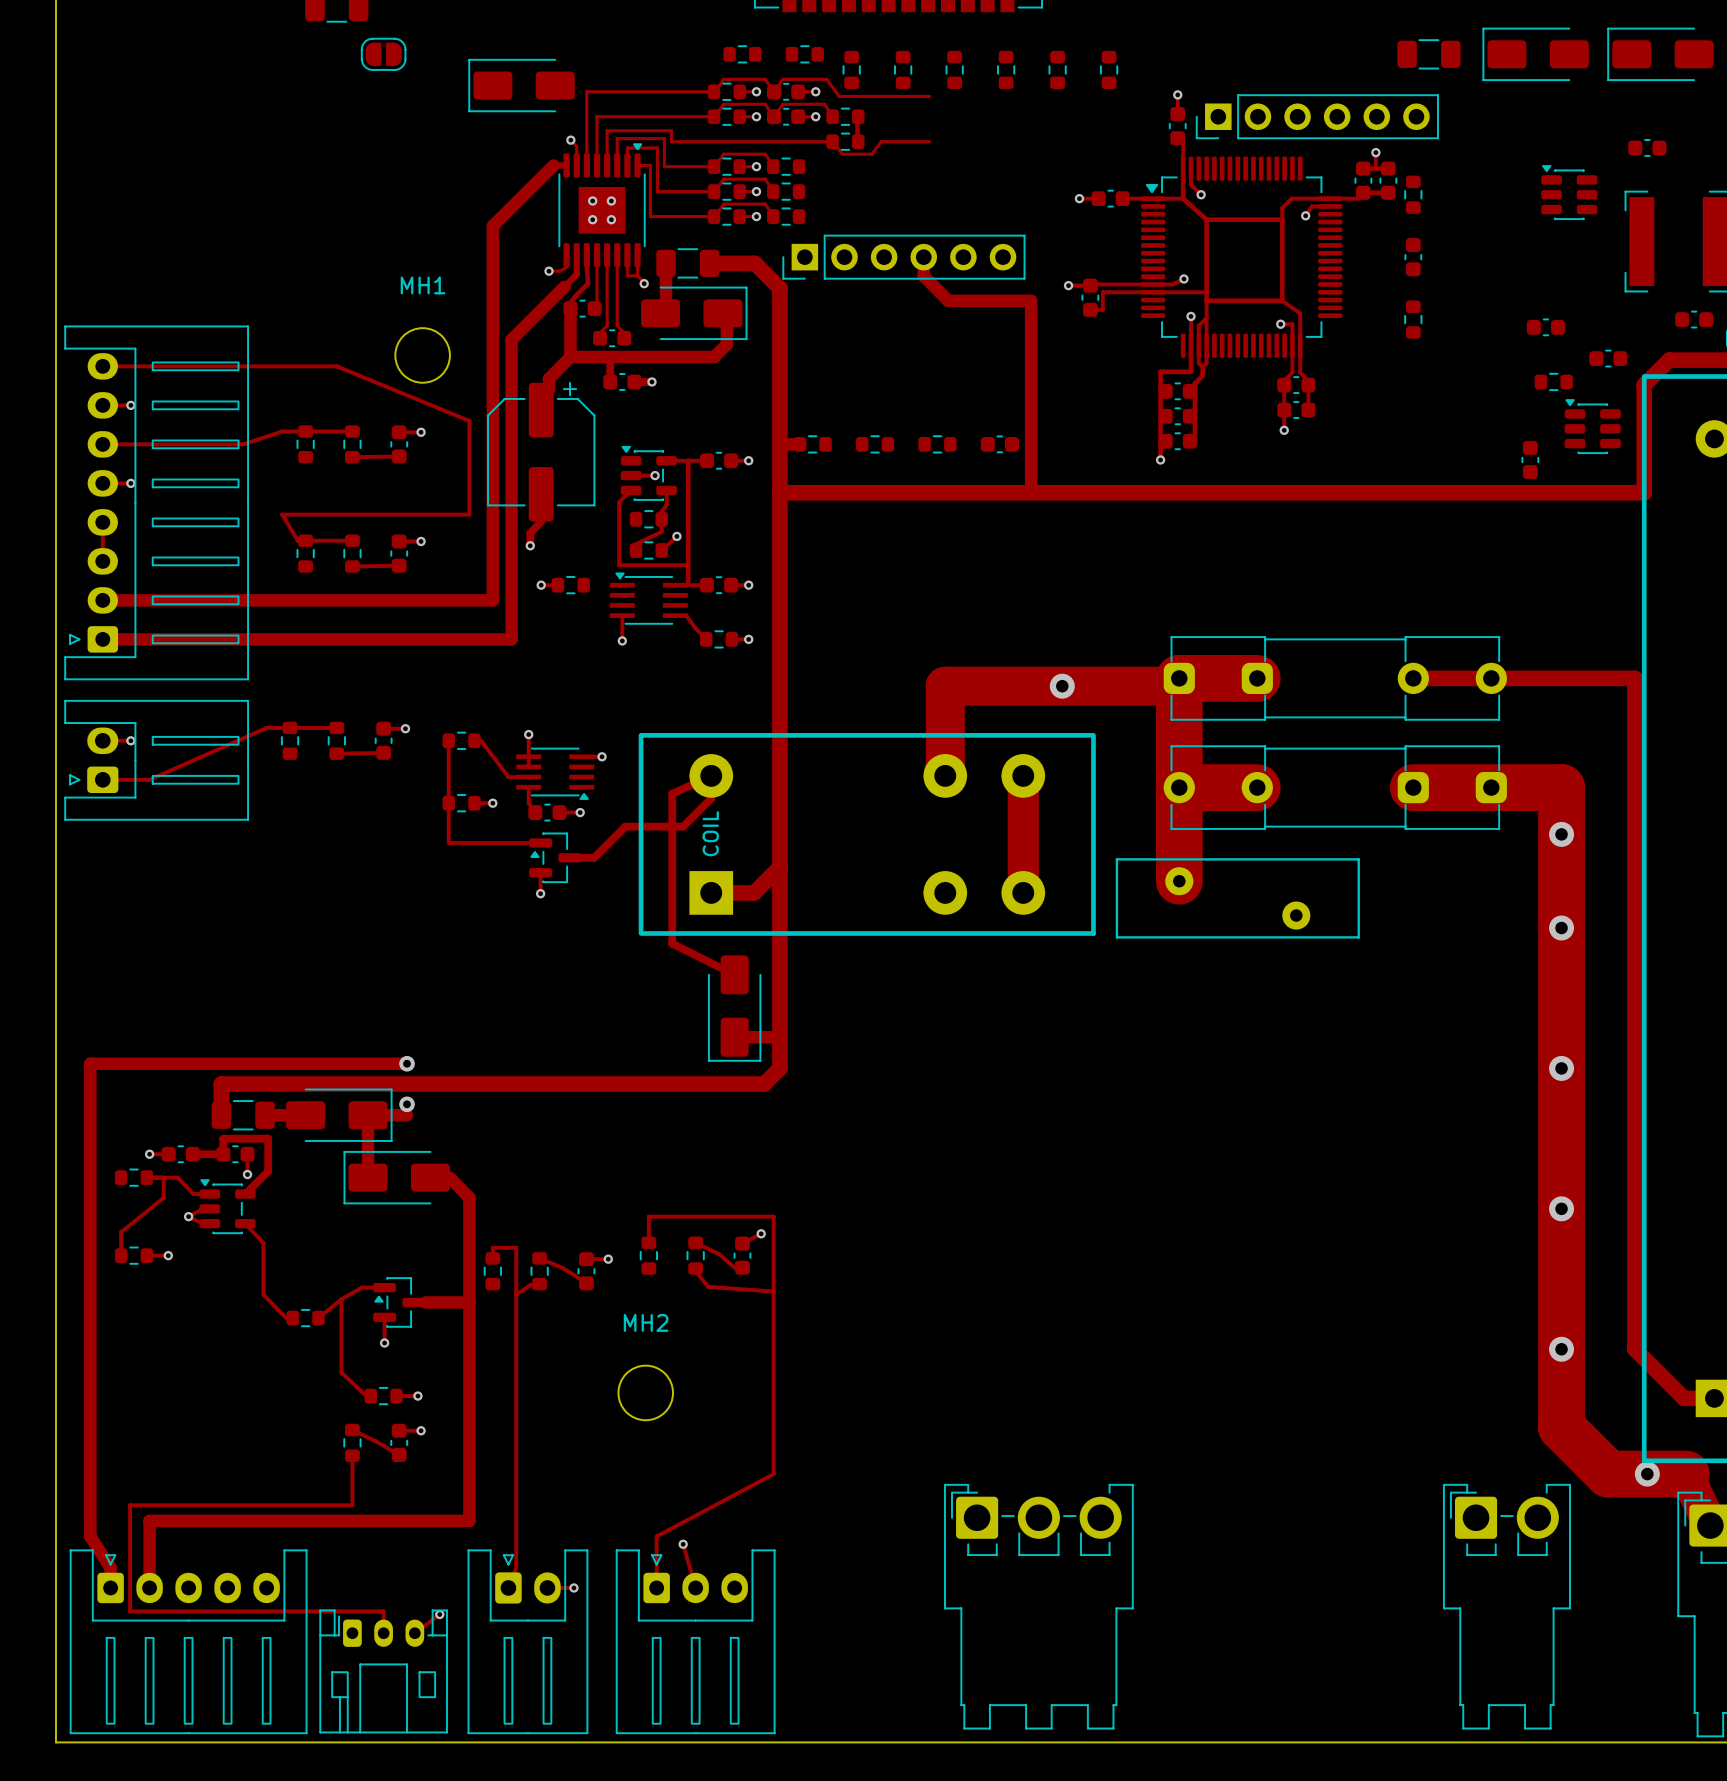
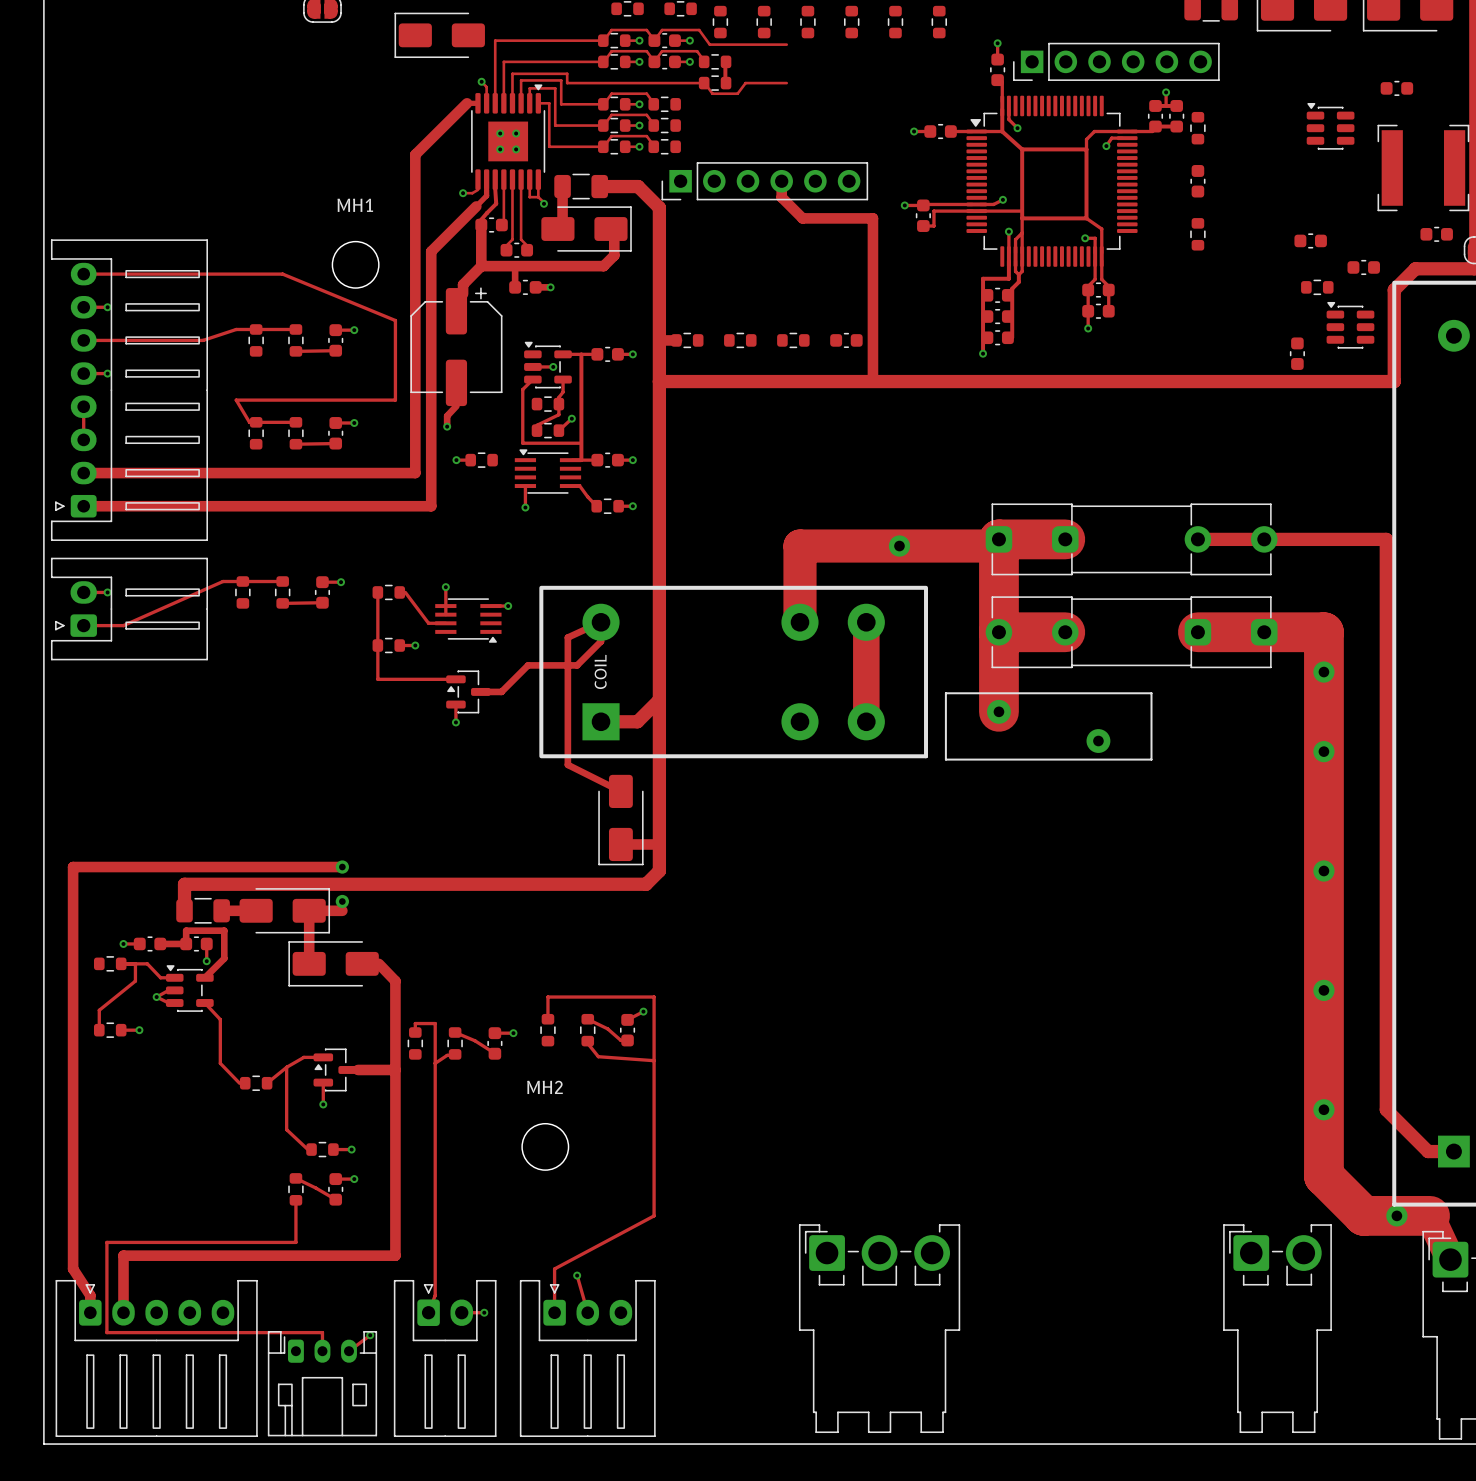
track: (528, 787) (528, 803) (535, 812) -> none
part: (547, 812) -> none
track: (559, 812) (580, 812) -> none
via: (580, 812) -> none

